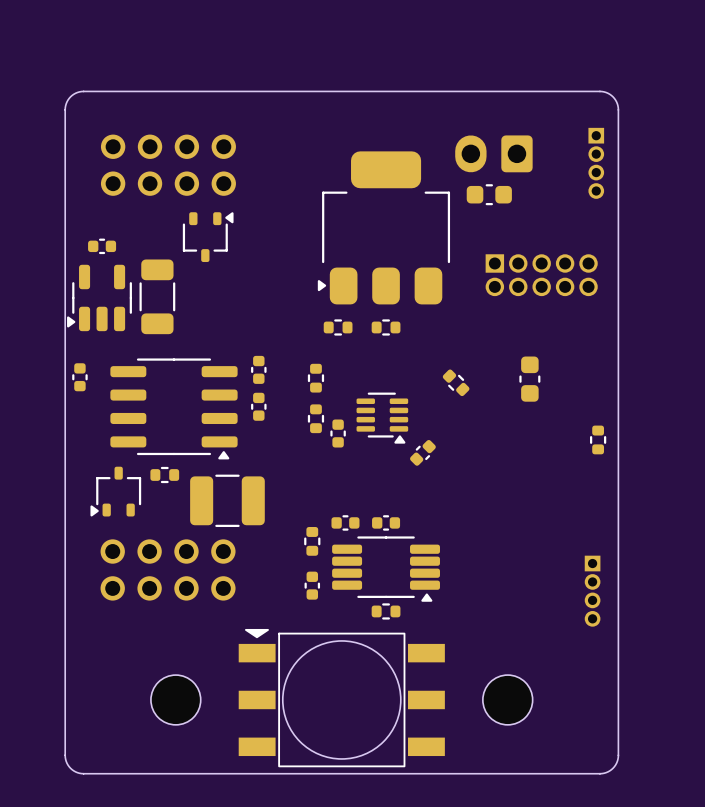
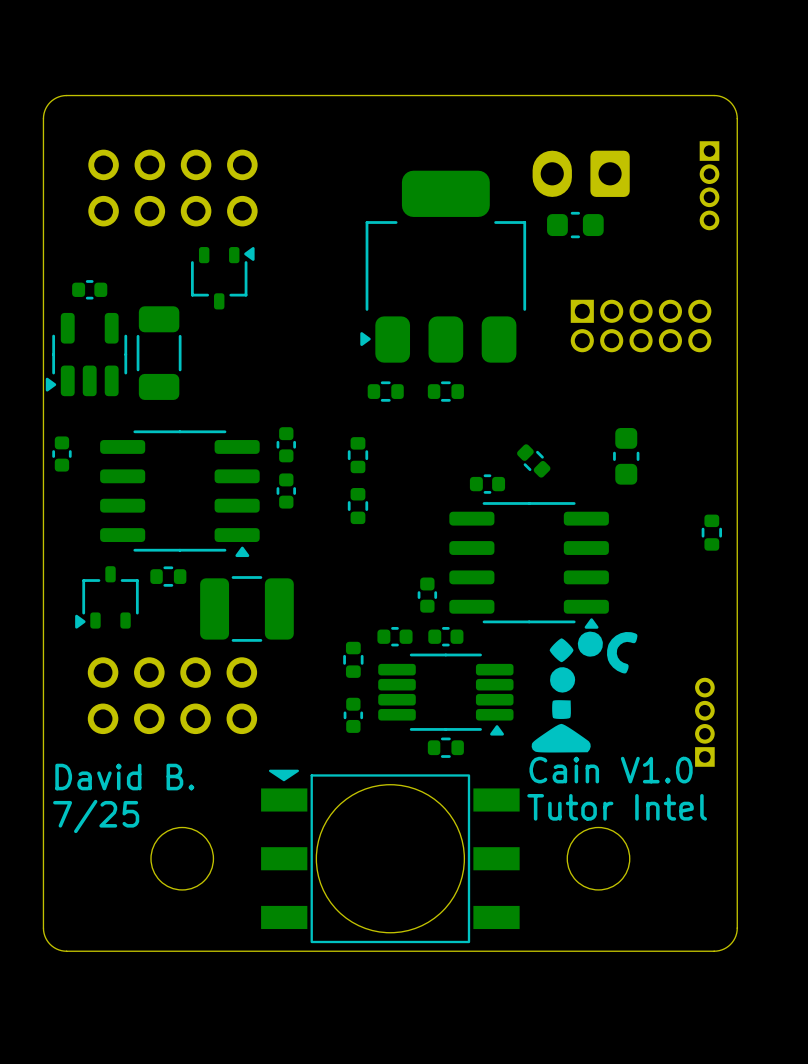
part: none -> (487, 484)
part: (382, 418) -> none
part: (338, 433) -> none
part: (422, 452) -> none
part: none -> (529, 565)
part: none -> (427, 595)
drawing: none -> [531, 631, 638, 753]
part rotation: 0° (592, 591) -> 180° (704, 722)
text: none -> Cain V1.0 (611, 770)
text: none -> David B. (124, 777)
text: none -> Tutor Intel (617, 807)
text: none -> 7/25 (96, 816)

